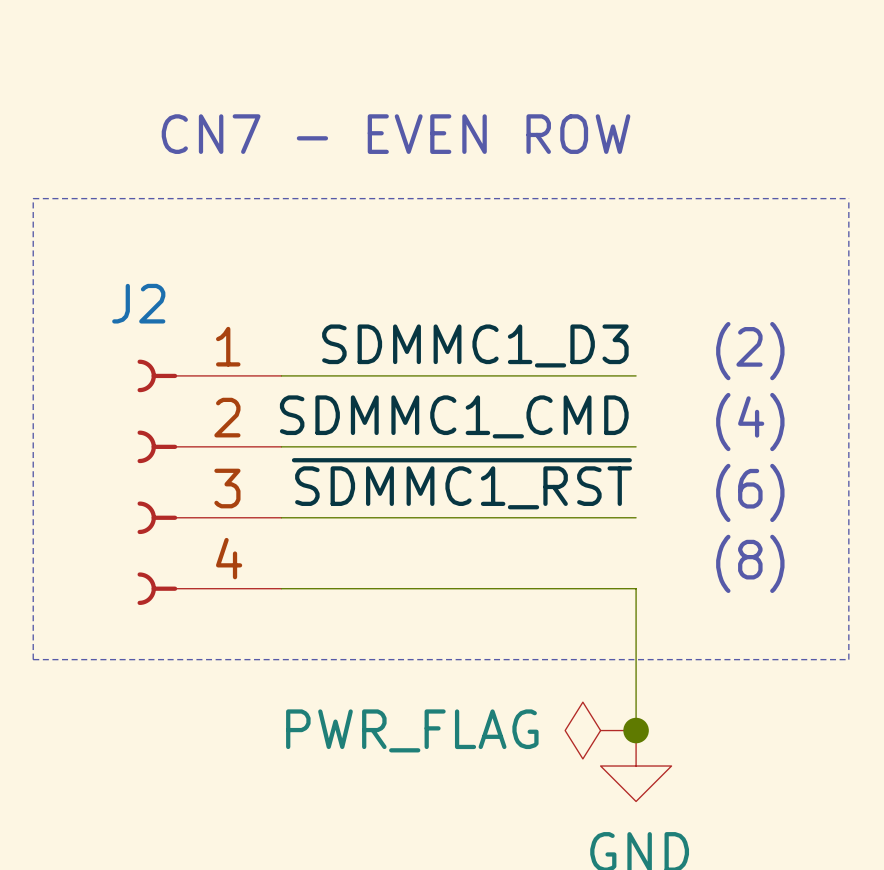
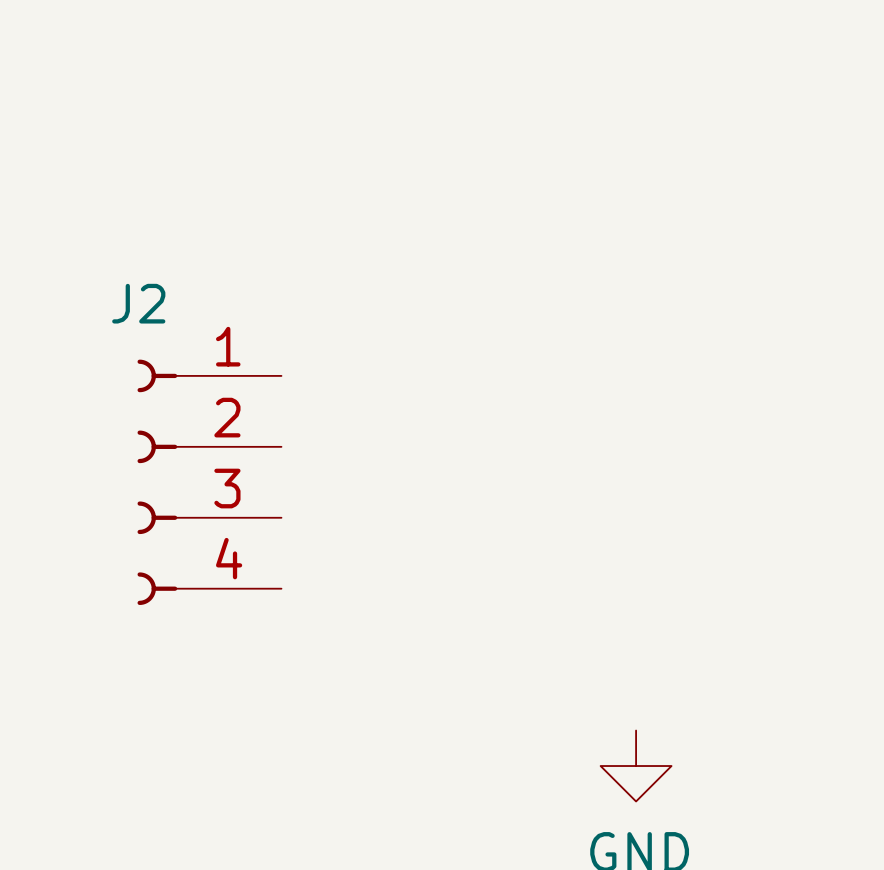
text: CN7 - EVEN ROW (396, 134) -> none
line: (33, 198) (33, 659) (848, 659) (848, 198) (33, 198) -> none
label: SDMMC1_D3 (475, 345) -> none
text: (2) (750, 351) -> none
wire: (281, 375) (636, 375) -> none
label: SDMMC1_CMD (454, 416) -> none
text: (4) (750, 422) -> none
wire: (281, 446) (636, 446) -> none
label: ~{SDMMC1_RST} (461, 483) -> none
text: (6) (750, 492) -> none
wire: (281, 517) (636, 517) -> none
text: (8) (750, 563) -> none
wire: (281, 588) (636, 588) (636, 730) -> none
power symbol: PWR_FLAG (600, 730) -> none
junction: (636, 730) -> none

